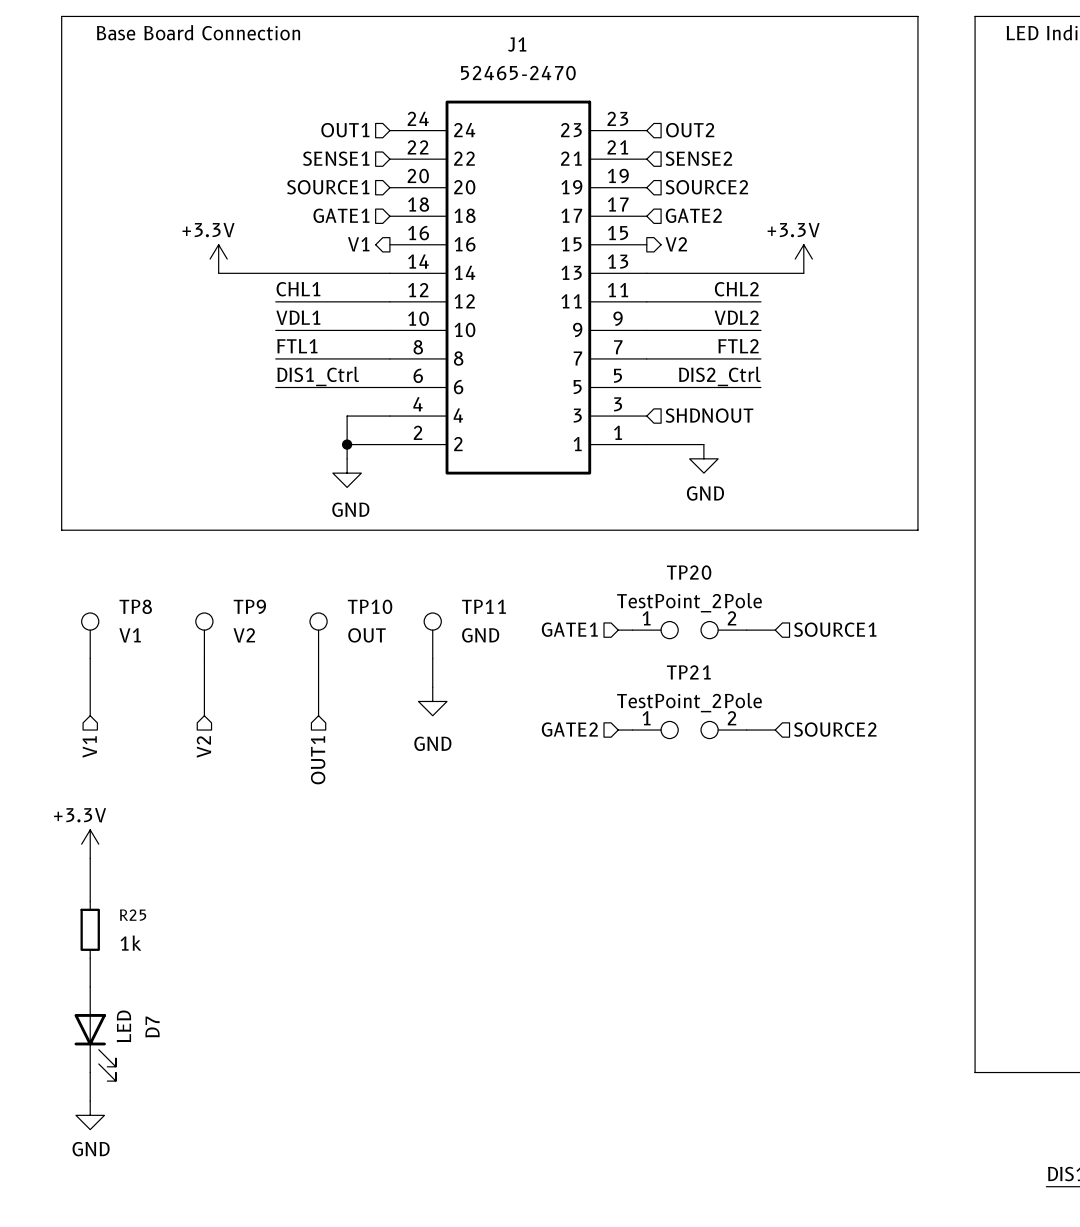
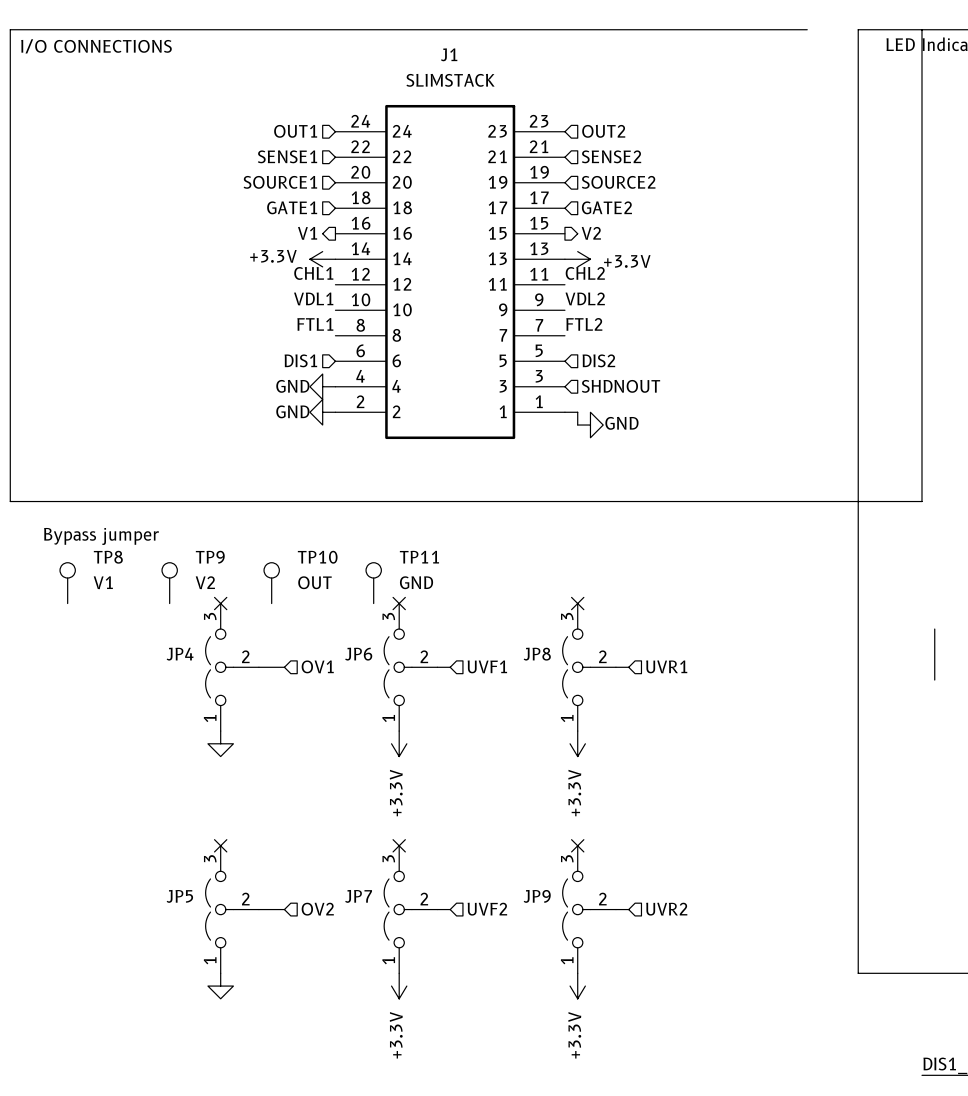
line: (61, 16) (61, 530) (917, 530) (917, 16) -> (42, 29) (10, 29) (10, 501) (921, 501) (921, 29)
text: Base Board Connection (198, 32) -> none
text: none -> I/O CONNECTIONS (96, 46)
J1 value: 52465-2470 (518, 73) -> SLIMSTACK (450, 80)
power symbol text position: +3.3V (208, 230) -> +3.3V (273, 256)
power symbol text position: +3.3V (793, 230) -> +3.3V (627, 261)
power symbol rotation: 0° (218, 259) -> 90° counterclockwise (322, 259)
power symbol position: +3.3V (218, 259) -> +3.3V (322, 259)
power symbol rotation: 0° (803, 259) -> 90° clockwise (577, 259)
power symbol position: +3.3V (803, 259) -> +3.3V (577, 259)
wire: (218, 273) (389, 273) -> none
wire: (646, 273) (803, 273) -> none
label position: CHL1 (298, 289) -> CHL1 (313, 273)
label position: CHL2 (736, 289) -> CHL2 (585, 273)
wire: (275, 301) (389, 301) -> none
wire: (646, 301) (760, 301) -> none
label position: VDL1 (298, 317) -> VDL1 (313, 298)
label position: VDL2 (736, 317) -> VDL2 (585, 298)
wire: (275, 330) (389, 330) -> none
wire: (646, 330) (760, 330) -> none
label position: FTL1 (297, 346) -> FTL1 (315, 324)
label position: FTL2 (738, 346) -> FTL2 (584, 324)
wire: (275, 358) (389, 358) -> none
wire: (646, 358) (760, 358) -> none
label: DIS1_Ctrl (318, 376) -> none
label: DIS2_Ctrl (719, 376) -> none
wire: (275, 387) (389, 387) -> none
hierarchical label: none -> DIS1 (300, 360)
wire: (646, 387) (760, 387) -> none
hierarchical label: none -> DIS2 (598, 360)
power symbol: none -> GND (322, 386)
wire: (389, 416) (347, 416) (347, 458) -> none
wire: (347, 444) (389, 444) -> none
junction: (347, 444) -> none
power symbol: none -> GND (322, 412)
wire: (661, 444) (703, 444) -> (577, 412) (577, 425)
power symbol rotation: 0° (703, 458) -> 90° counterclockwise (590, 425)
power symbol position: GND (703, 458) -> GND (590, 425)
power symbol: GND (347, 473) -> none
text: none -> Bypass jumper (101, 536)
hierarchical label: GATE1 (569, 629) -> none
hierarchical label: SOURCE1 (835, 629) -> none
wire: (618, 630) (632, 630) -> (437, 667) (450, 667)
TP20: TestPoint_2Pole (689, 630) -> none
wire: (746, 630) (775, 630) -> none
wire: (90, 658) (90, 715) -> none
wire: (204, 658) (204, 715) -> none
no-connect mark: none -> (220, 603)
wire: (318, 658) (318, 715) -> none
wire: (432, 658) (432, 687) -> none
no-connect mark: none -> (399, 603)
no-connect mark: none -> (577, 603)
wire: none -> (934, 629) (934, 680)
power symbol: GND (432, 701) -> none
hierarchical label: none -> OV1 (317, 666)
hierarchical label: none -> UVF1 (487, 666)
hierarchical label: GATE2 (569, 729) -> none
hierarchical label: none -> UVR1 (666, 666)
hierarchical label: SOURCE2 (835, 729) -> none
JP4: none -> (232, 667)
JP6: none -> (410, 667)
wire: (618, 730) (632, 730) -> (615, 667) (628, 667)
JP8: none -> (589, 667)
TP21: TestPoint_2Pole (689, 730) -> none
wire: (746, 730) (775, 730) -> none
hierarchical label: V1 (89, 746) -> none
hierarchical label: V2 (203, 746) -> none
hierarchical label: OUT1 (318, 760) -> none
power symbol: none -> (220, 743)
power symbol: none -> +3.3V (399, 743)
power symbol: none -> +3.3V (577, 743)
power symbol: +3.3V (90, 844) -> none
wire: (90, 858) (90, 901) -> none
R25: 1k (90, 929) -> none
no-connect mark: none -> (220, 845)
no-connect mark: none -> (399, 845)
no-connect mark: none -> (577, 845)
wire: (90, 958) (90, 986) -> none
hierarchical label: none -> OV2 (317, 909)
hierarchical label: none -> UVF2 (487, 909)
hierarchical label: none -> UVR2 (666, 909)
JP5: none -> (232, 909)
wire: none -> (258, 909) (284, 909)
JP7: none -> (410, 909)
wire: none -> (437, 909) (450, 909)
JP9: none -> (589, 909)
wire: none -> (615, 909) (628, 909)
D7: LED (95, 1033) -> none
wire: (90, 1072) (90, 1101) -> none
power symbol: none -> (220, 986)
power symbol: none -> +3.3V (399, 986)
power symbol: none -> +3.3V (577, 986)
power symbol: GND (90, 1115) -> none

